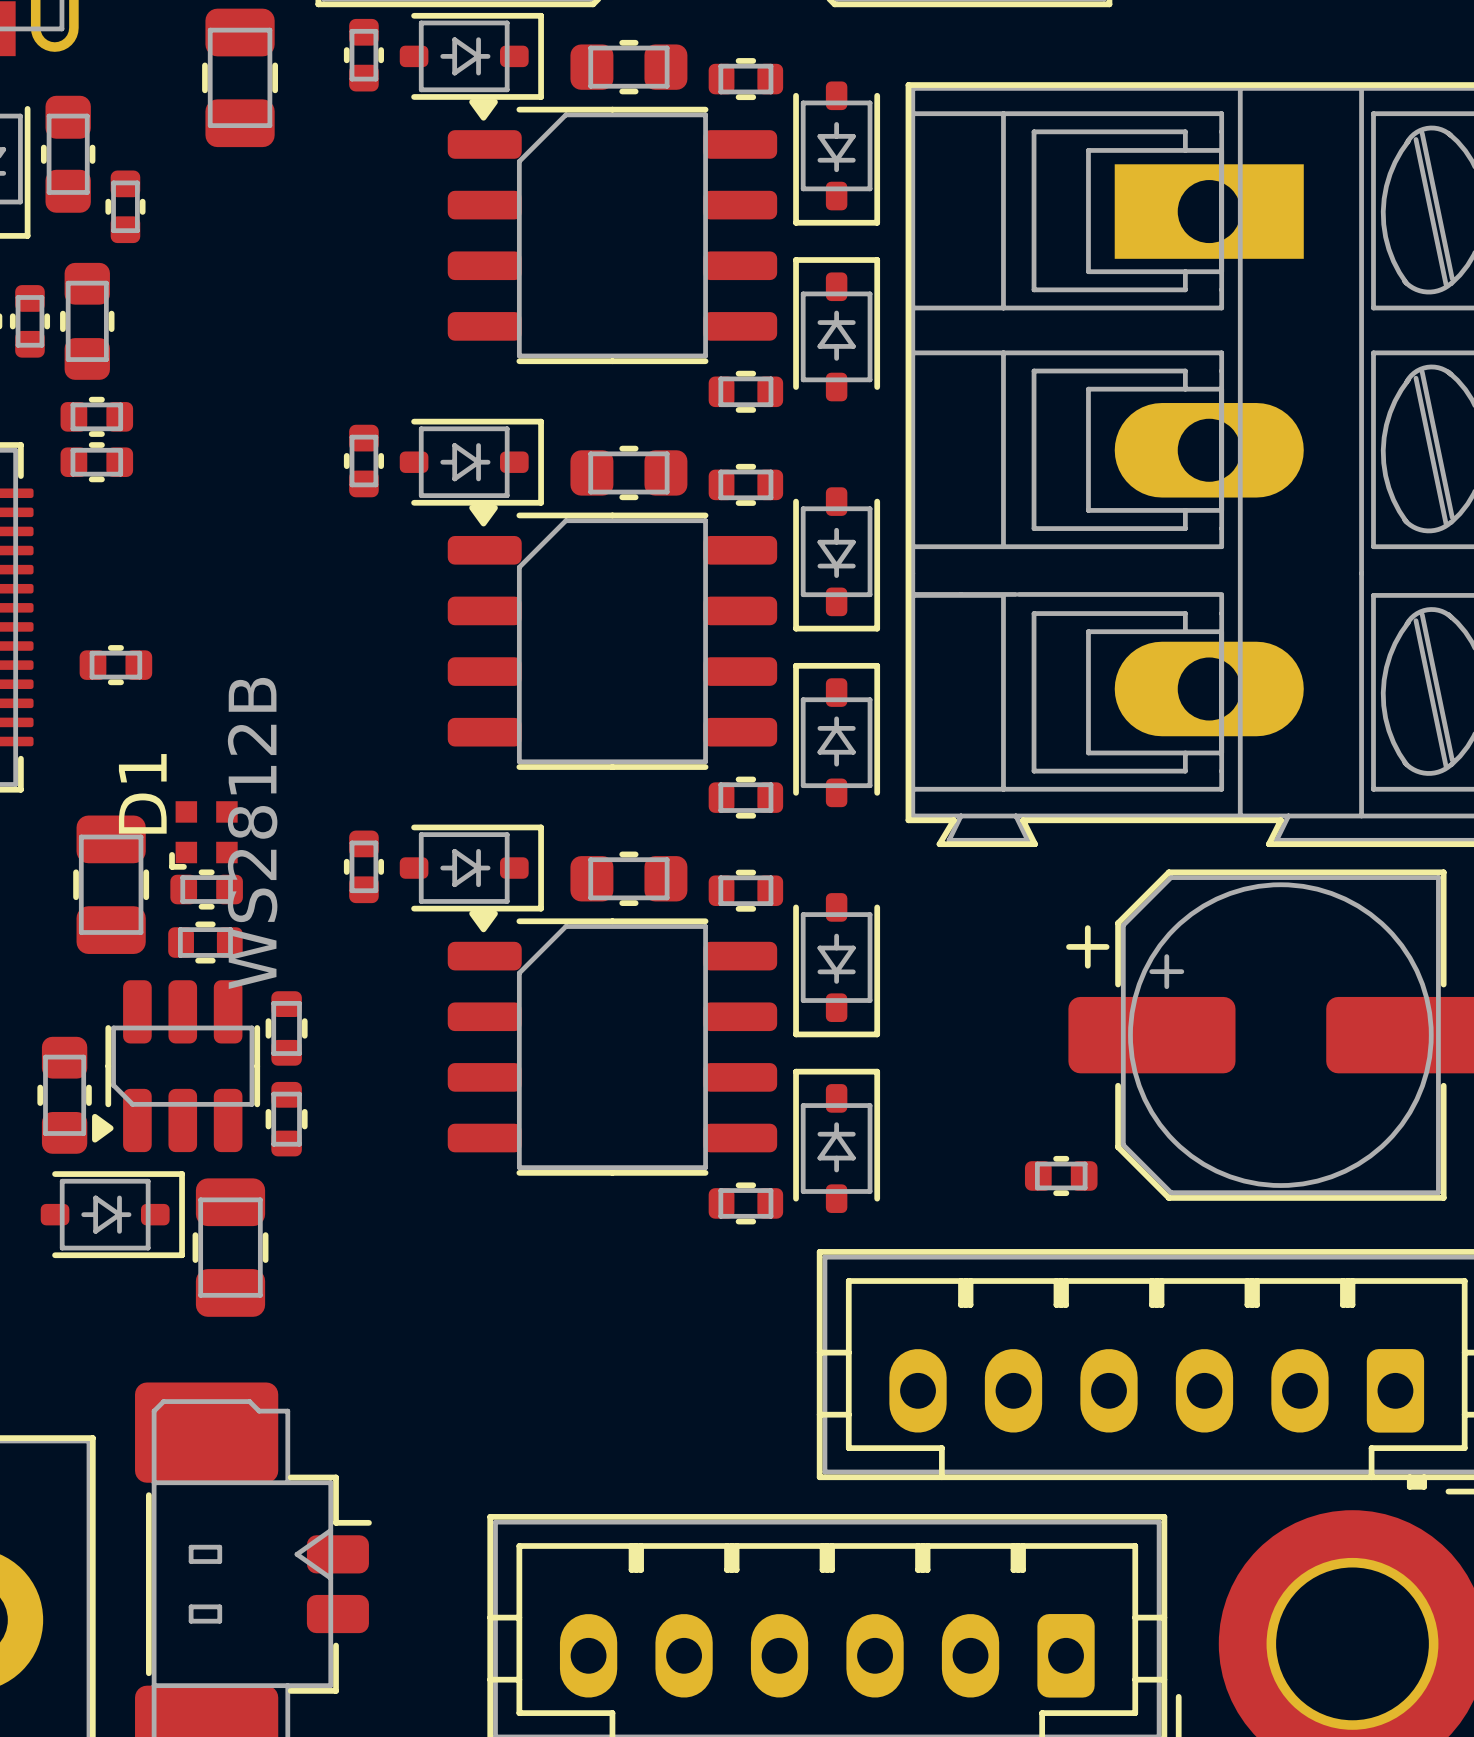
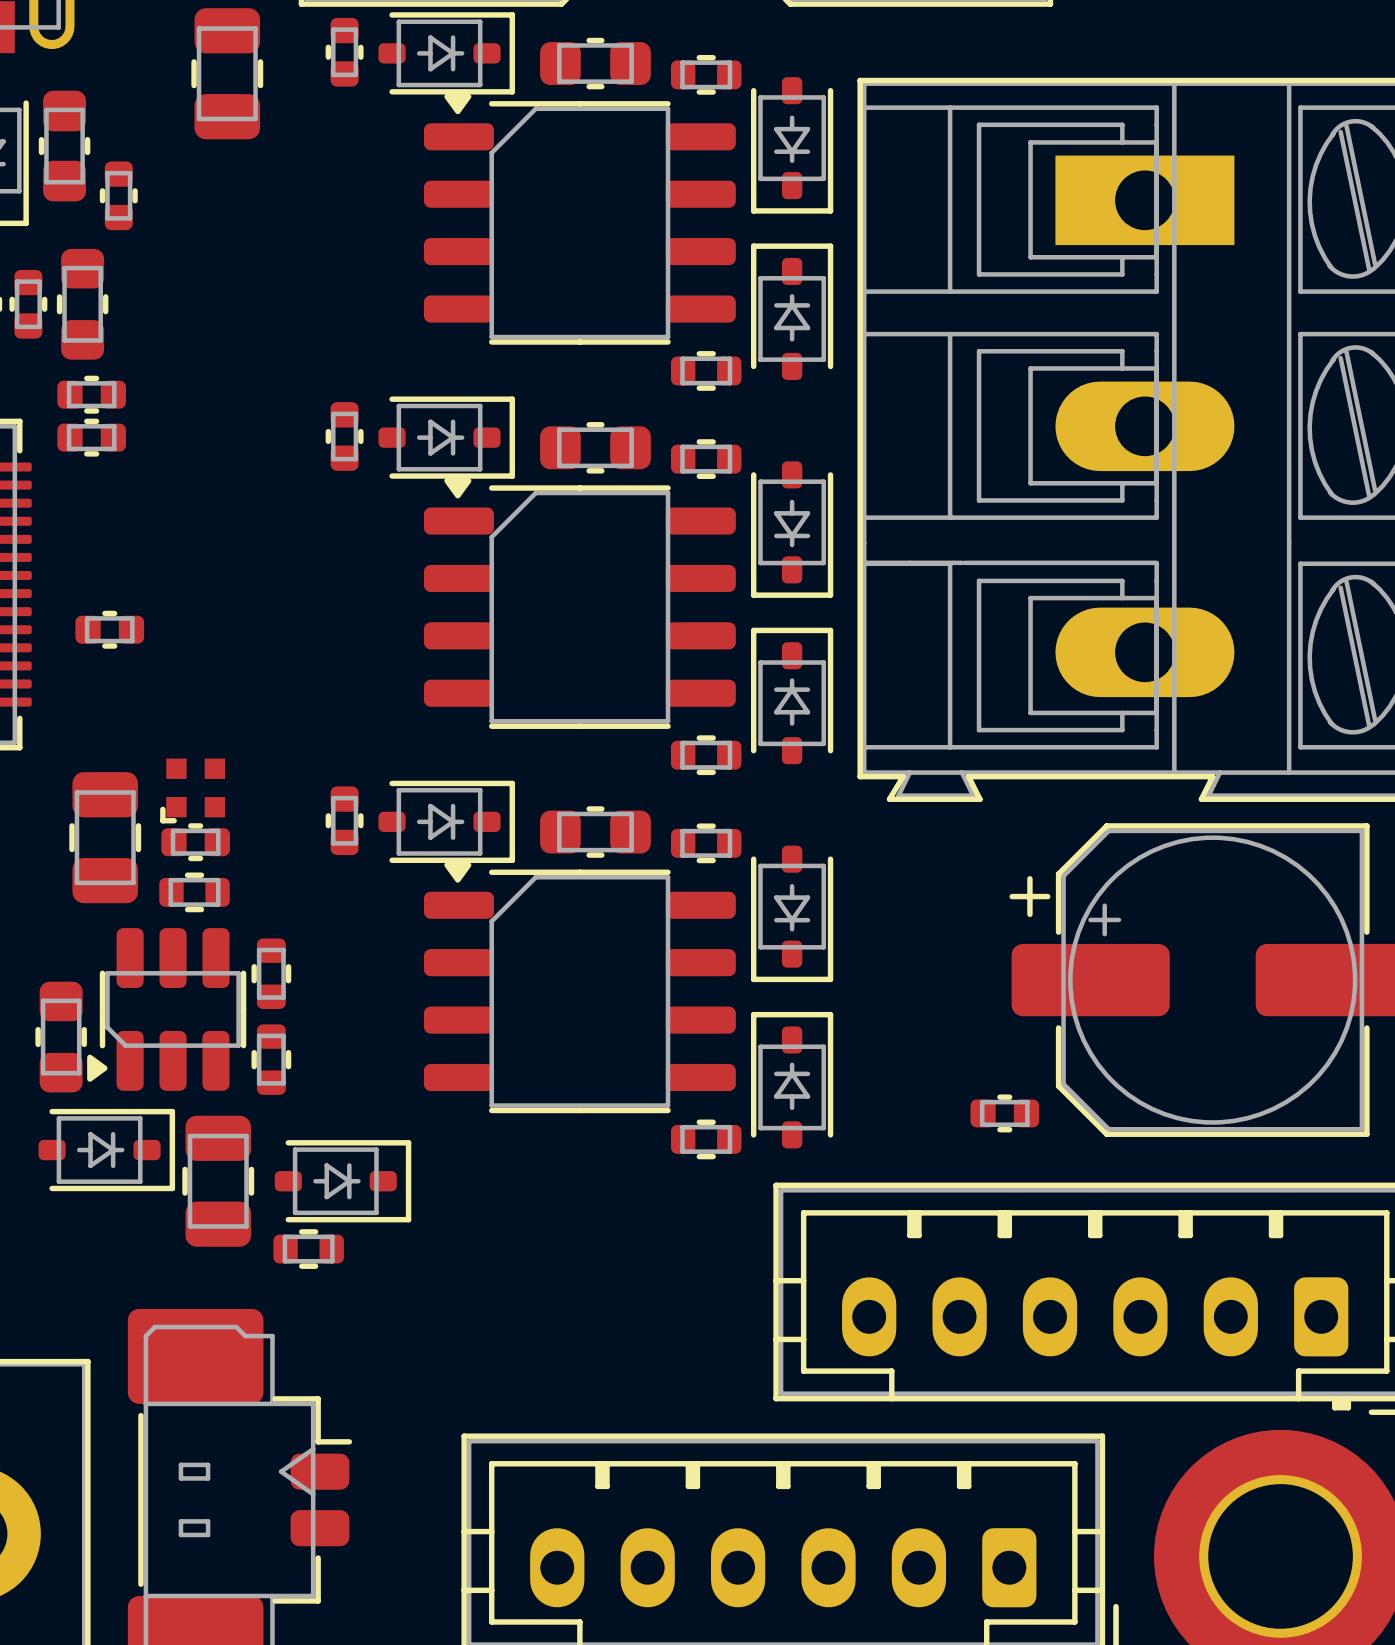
D1 name: D1 (142, 793) -> none
D1 value: WS2812B (252, 833) -> none
part: none -> (343, 1181)
part: none -> (308, 1249)

